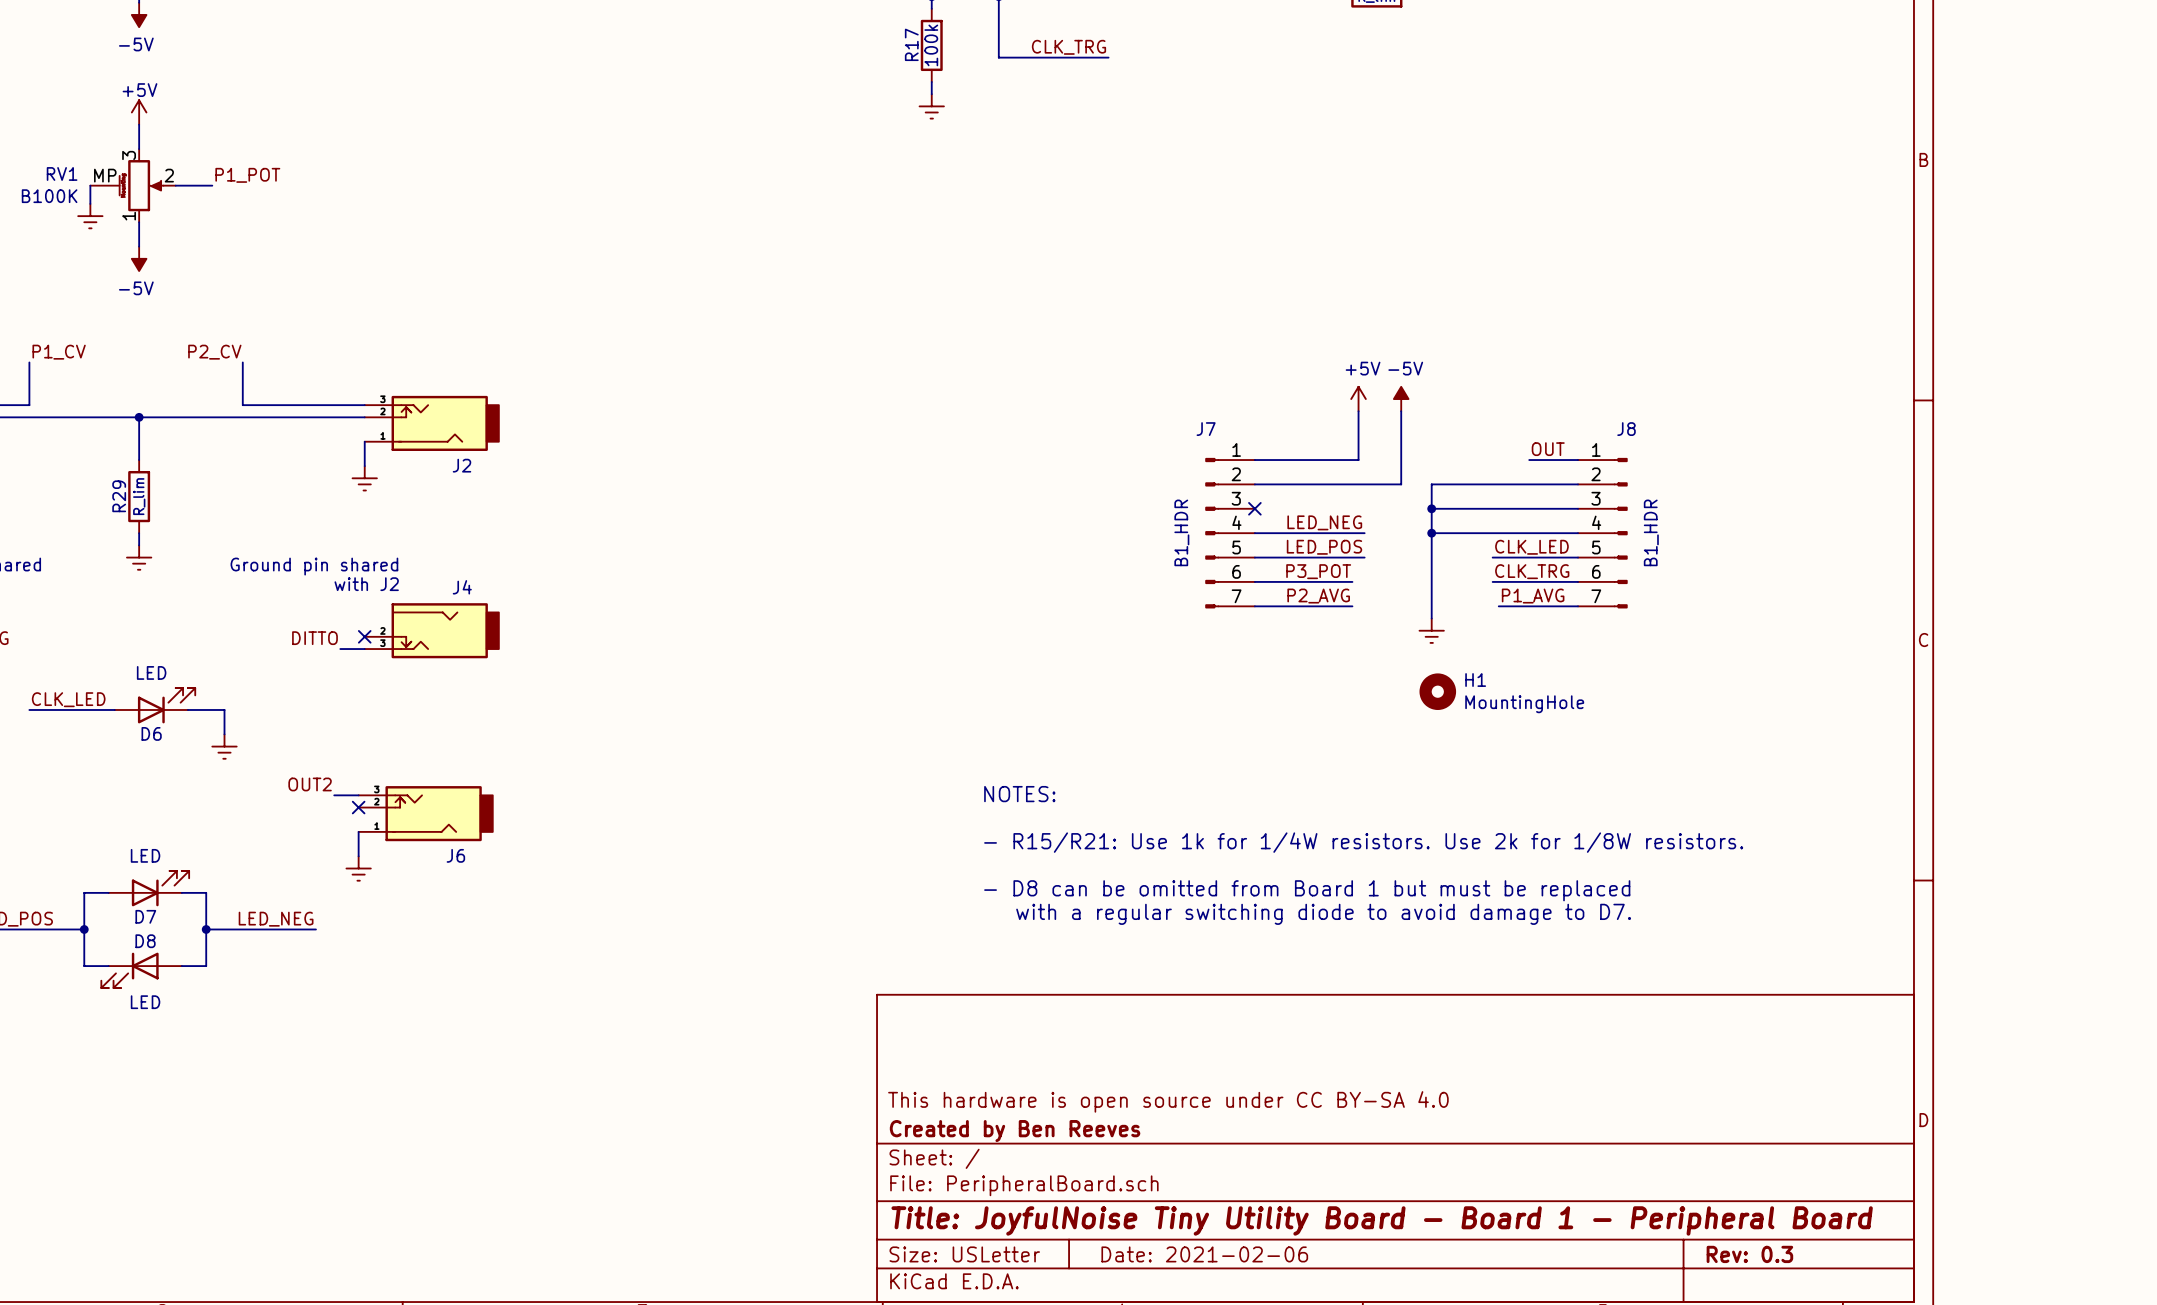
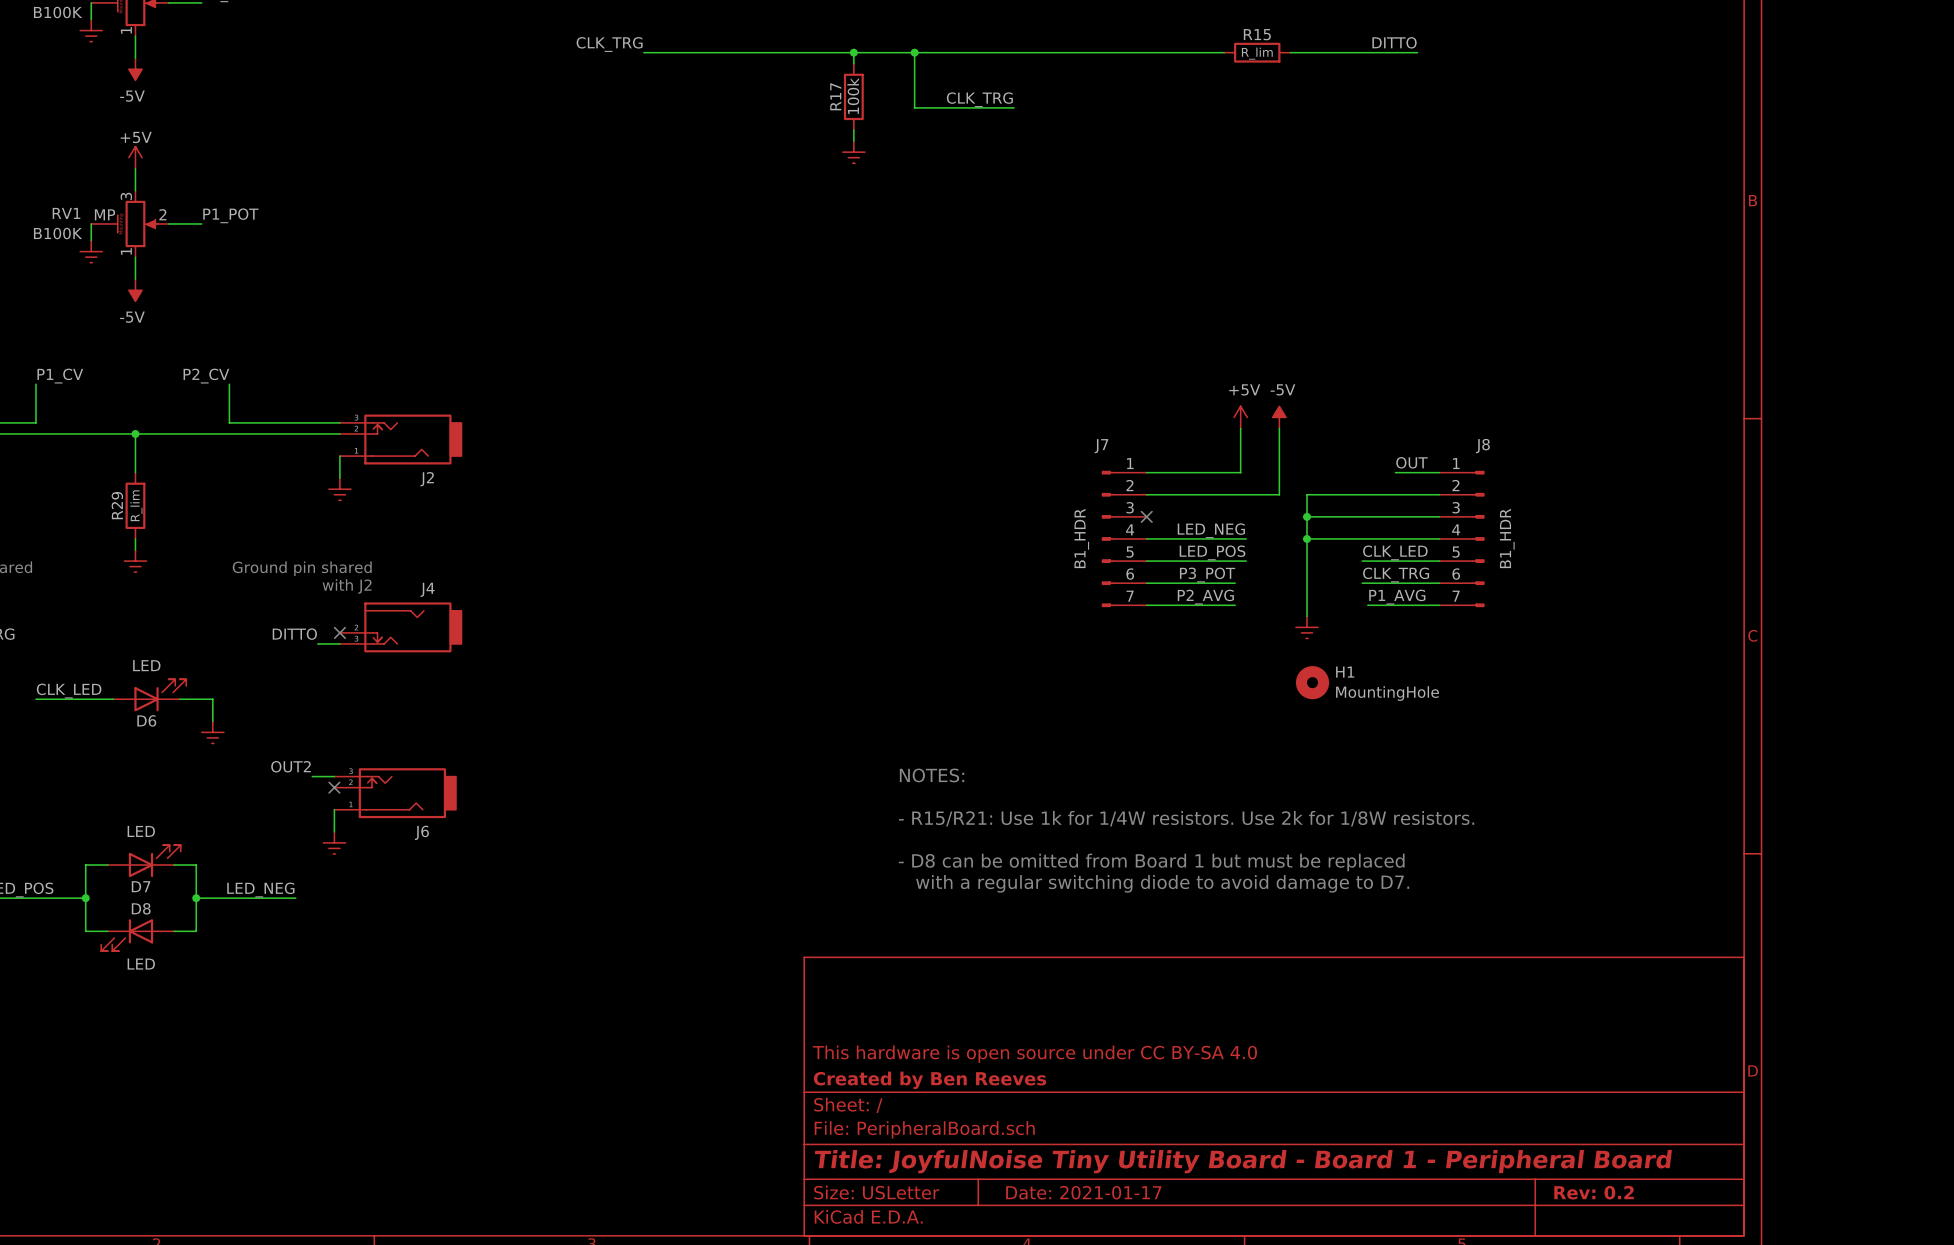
title block: Date: 2021-02-06 (1204, 1254) -> Date: 2021-01-17 (1083, 1192)
title block: Rev: 0.3 (1749, 1254) -> Rev: 0.2 (1594, 1192)

